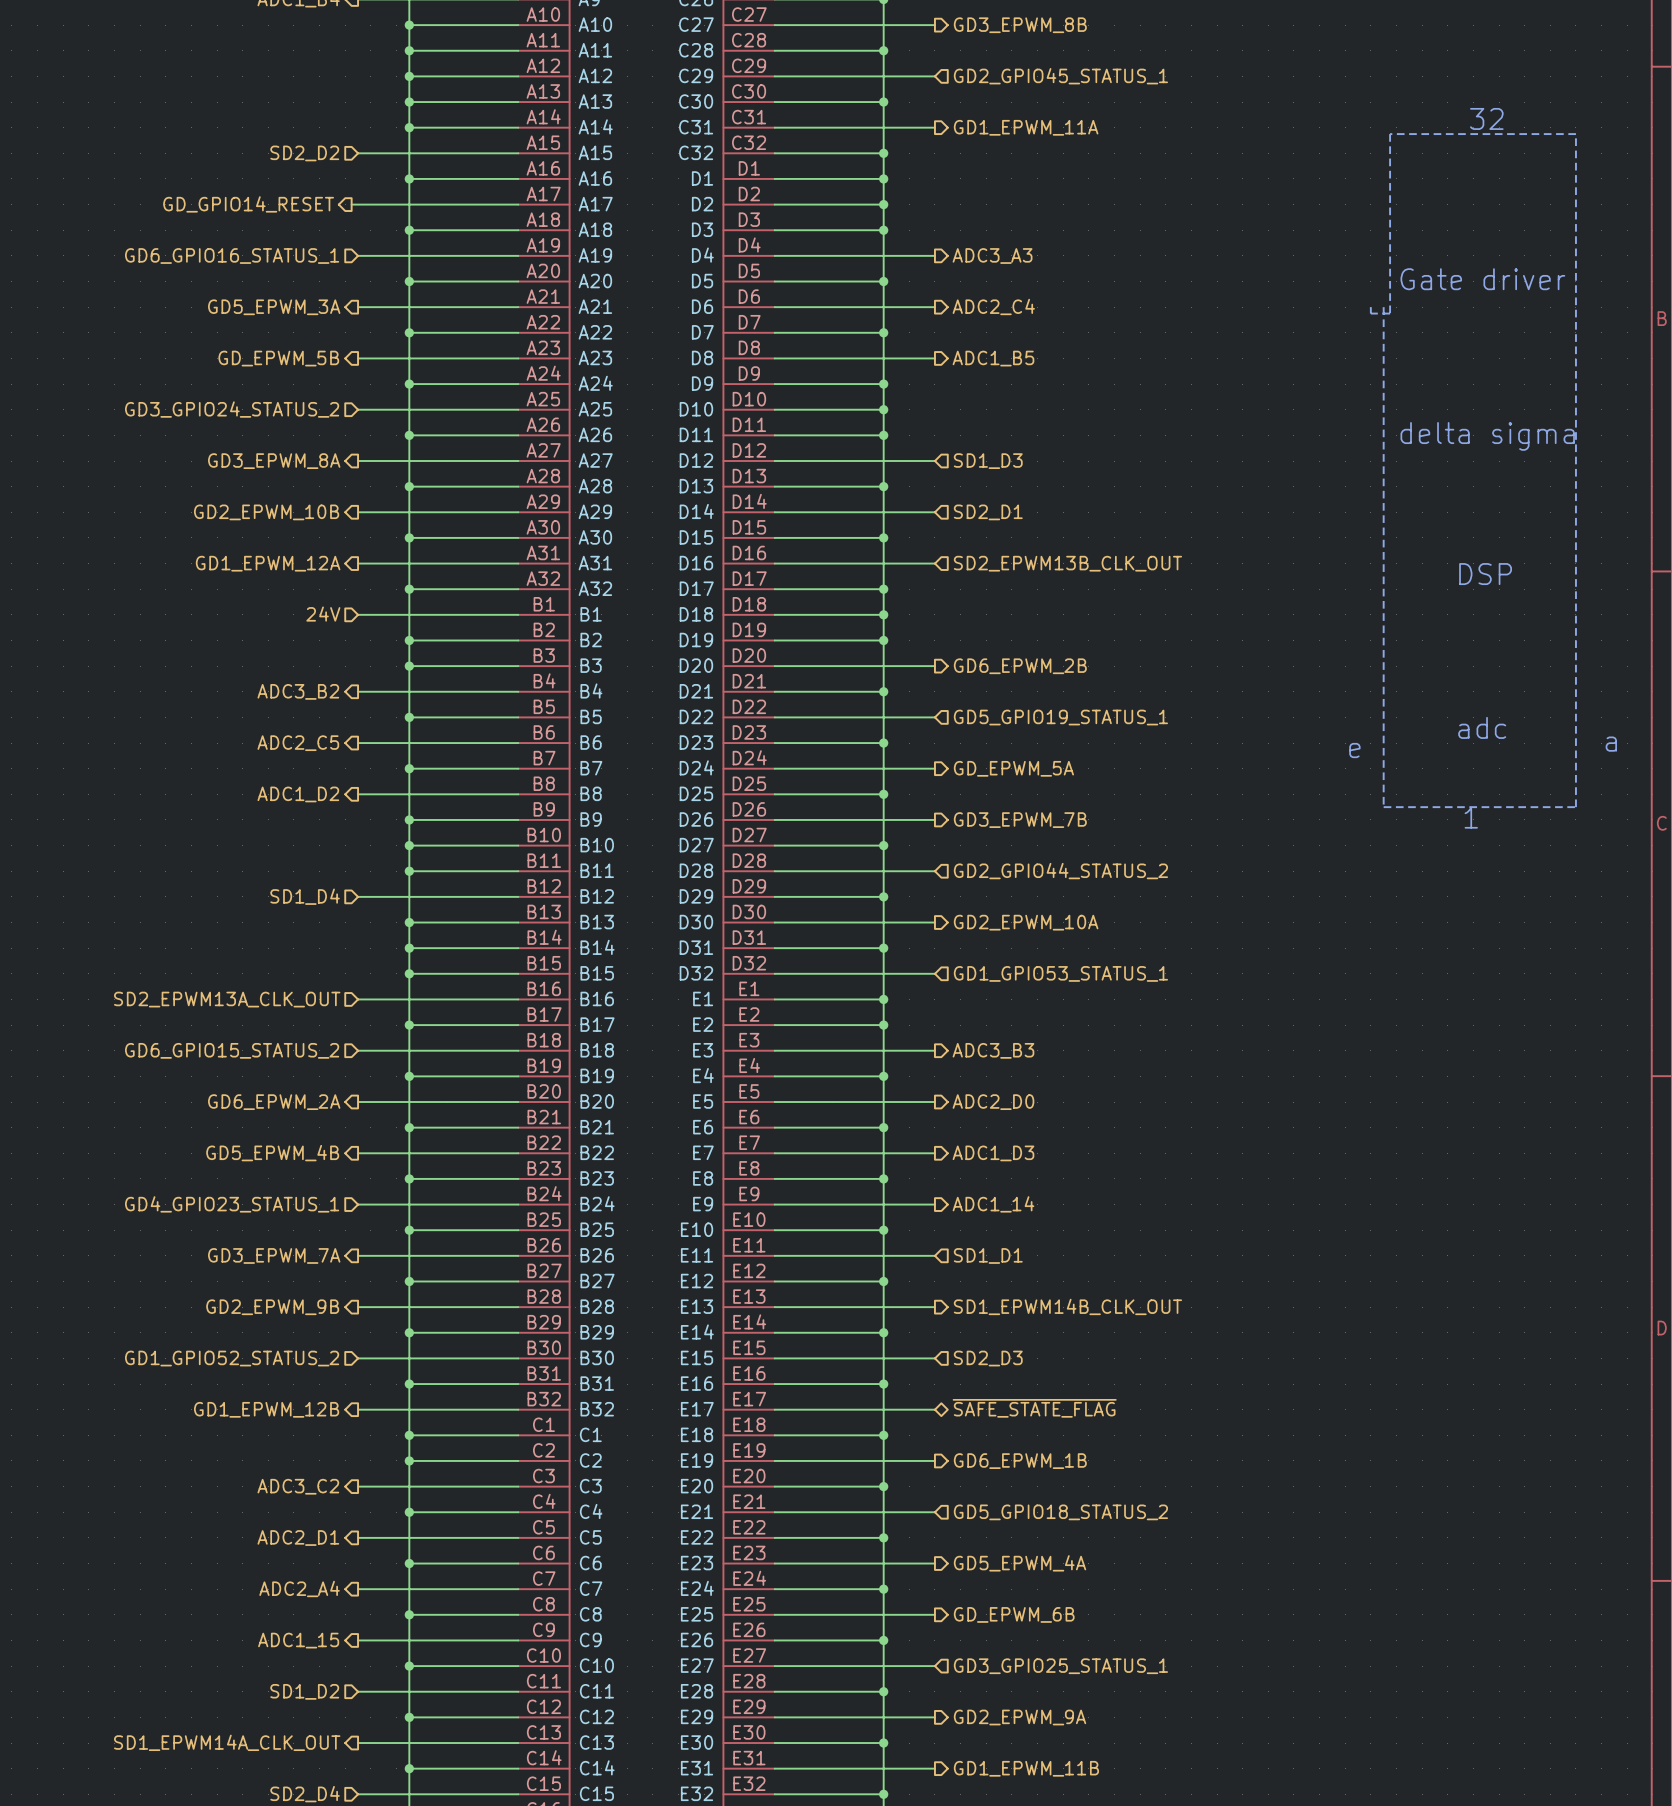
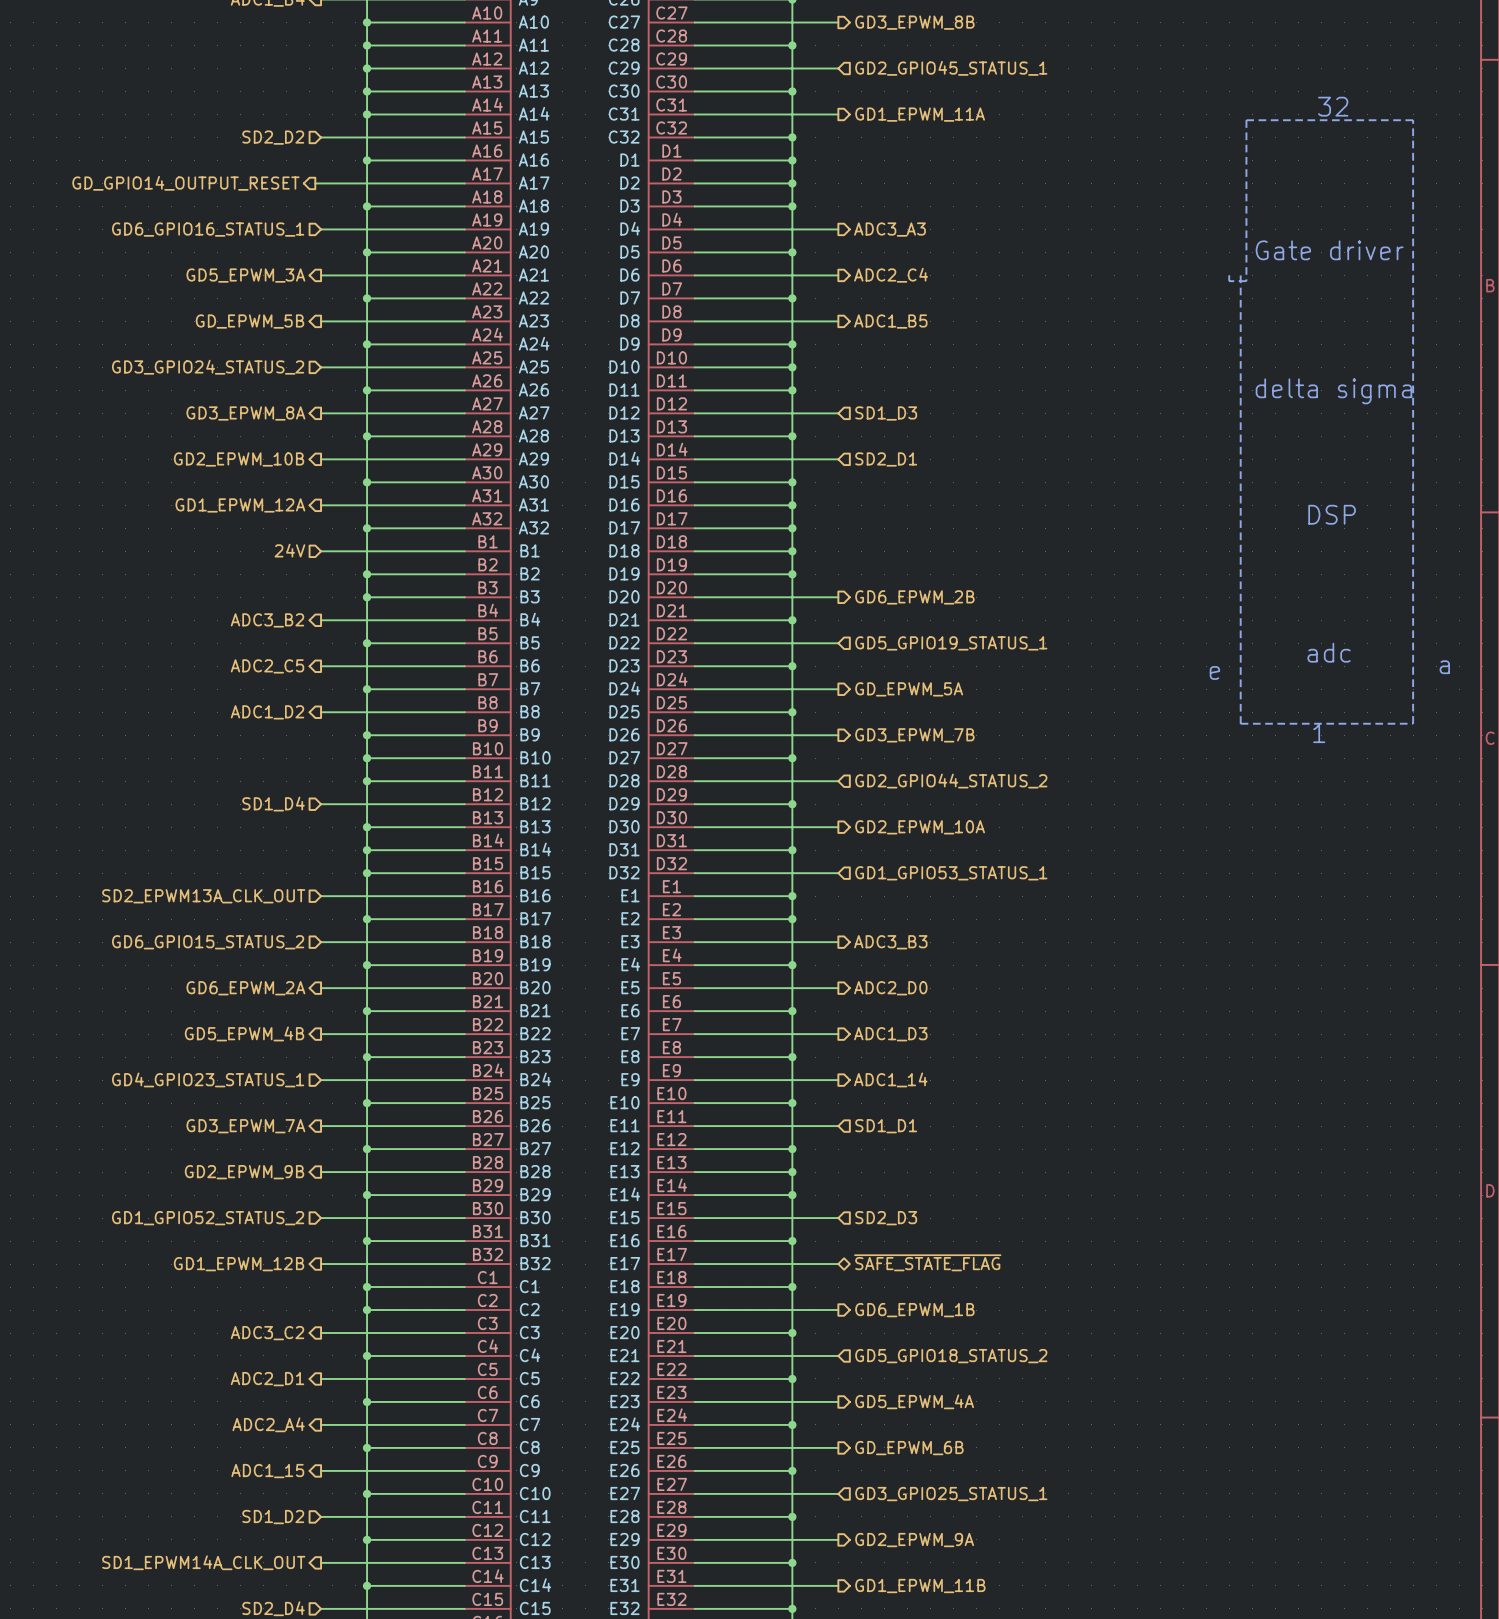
hierarchical label: GD_GPIO14_RESET (248, 204) -> GD_GPIO14_OUTPUT_RESET (185, 183)
wire: (883, 563) (934, 563) -> none
junction: none -> (792, 505)
hierarchical label: SD2_EPWM13B_CLK_OUT (1067, 563) -> none
hierarchical label: SD1_EPWM14B_CLK_OUT (1067, 1306) -> none
wire: (883, 1307) (934, 1307) -> none
junction: none -> (792, 1172)

